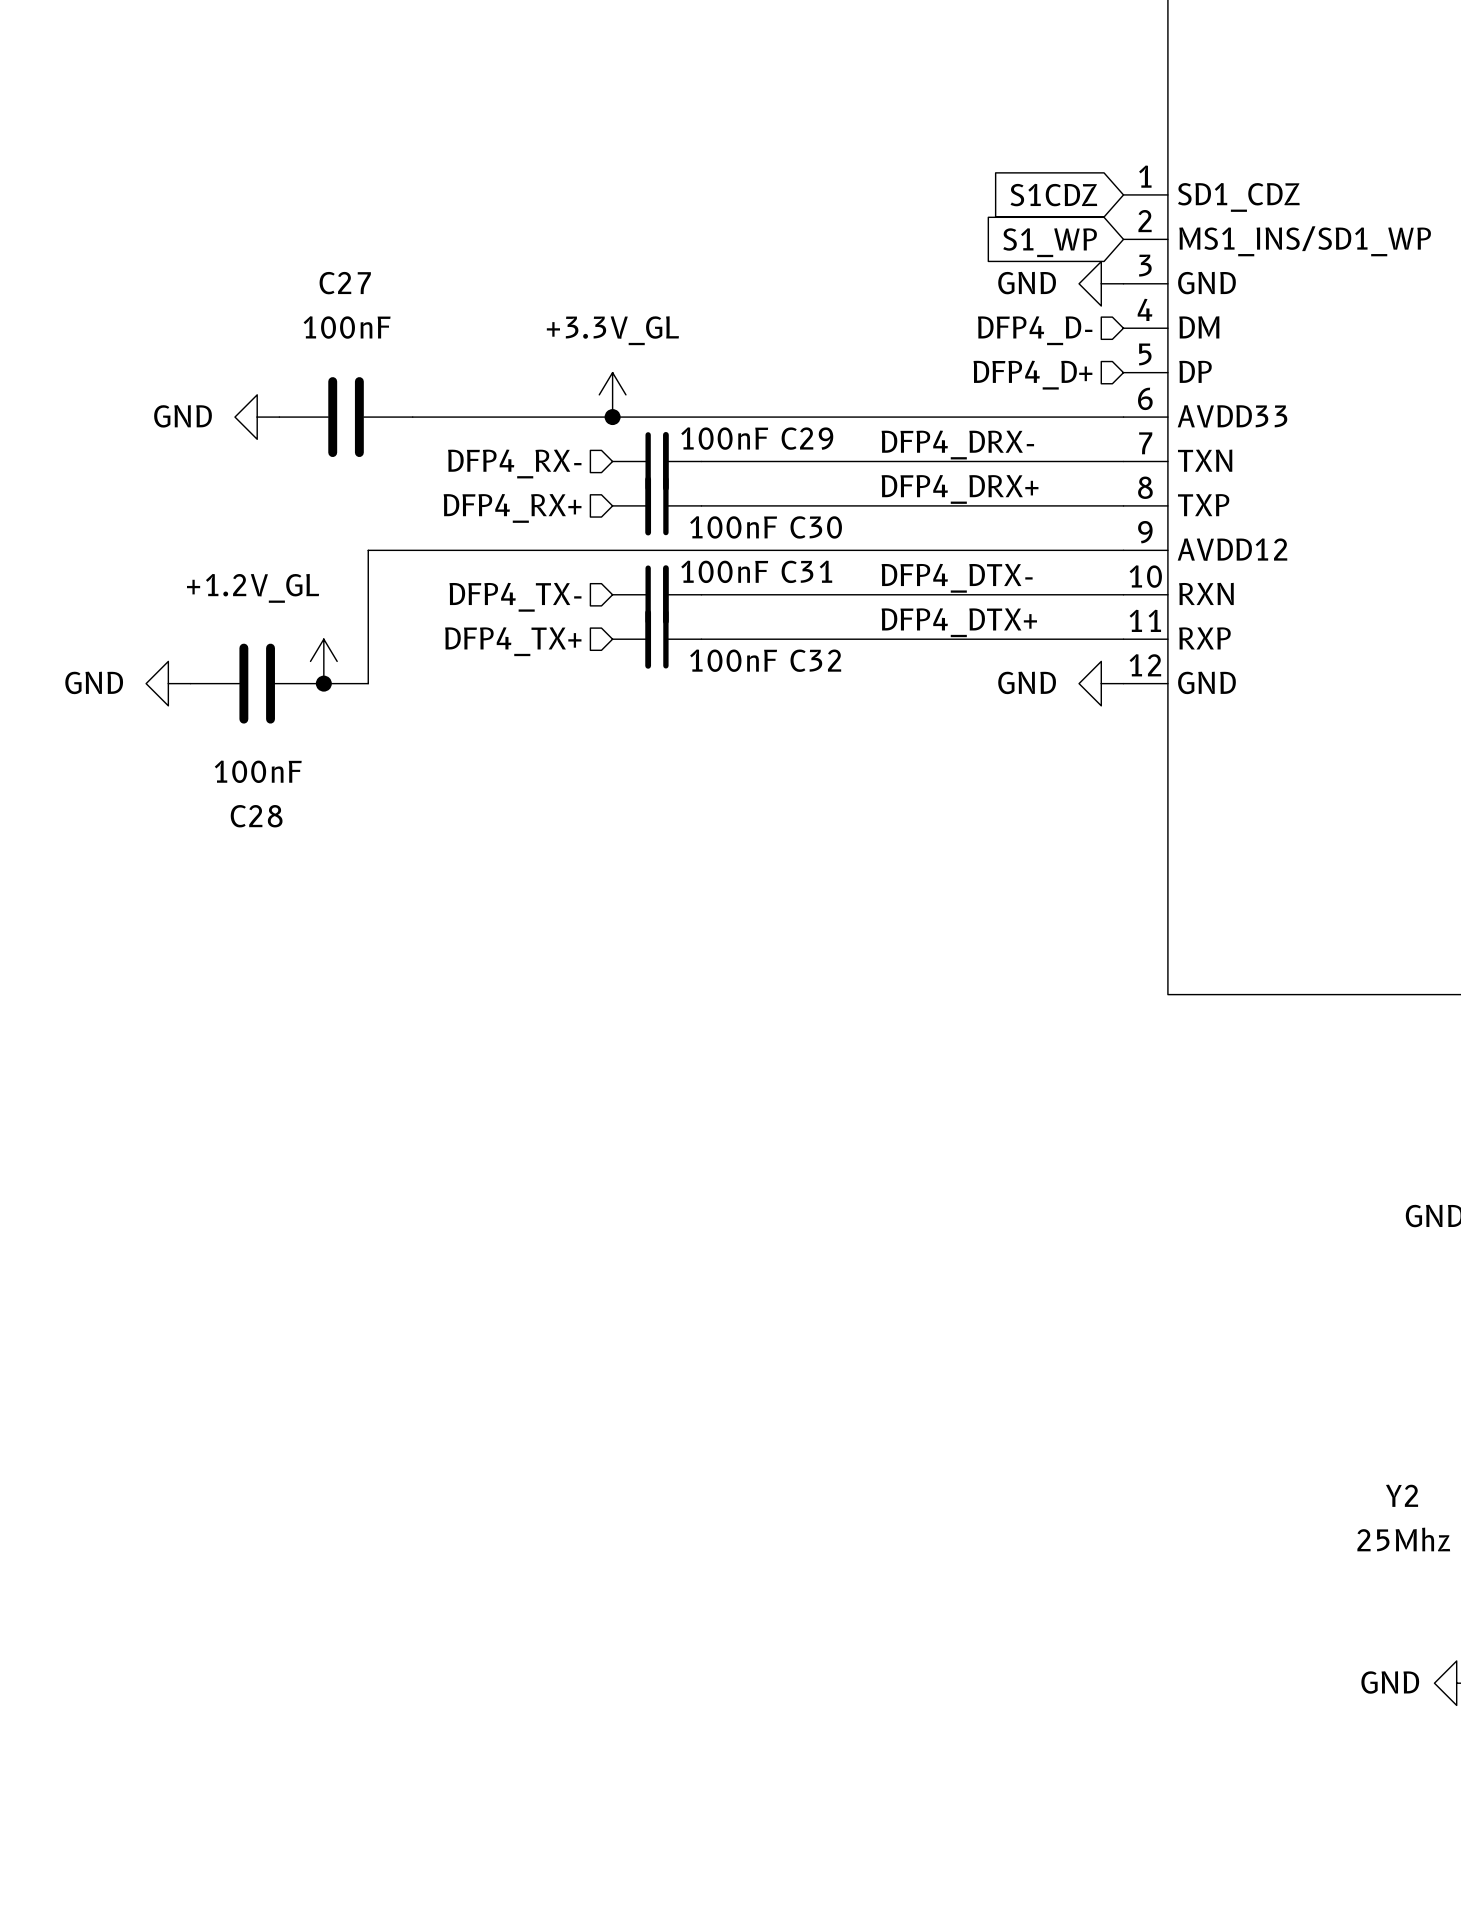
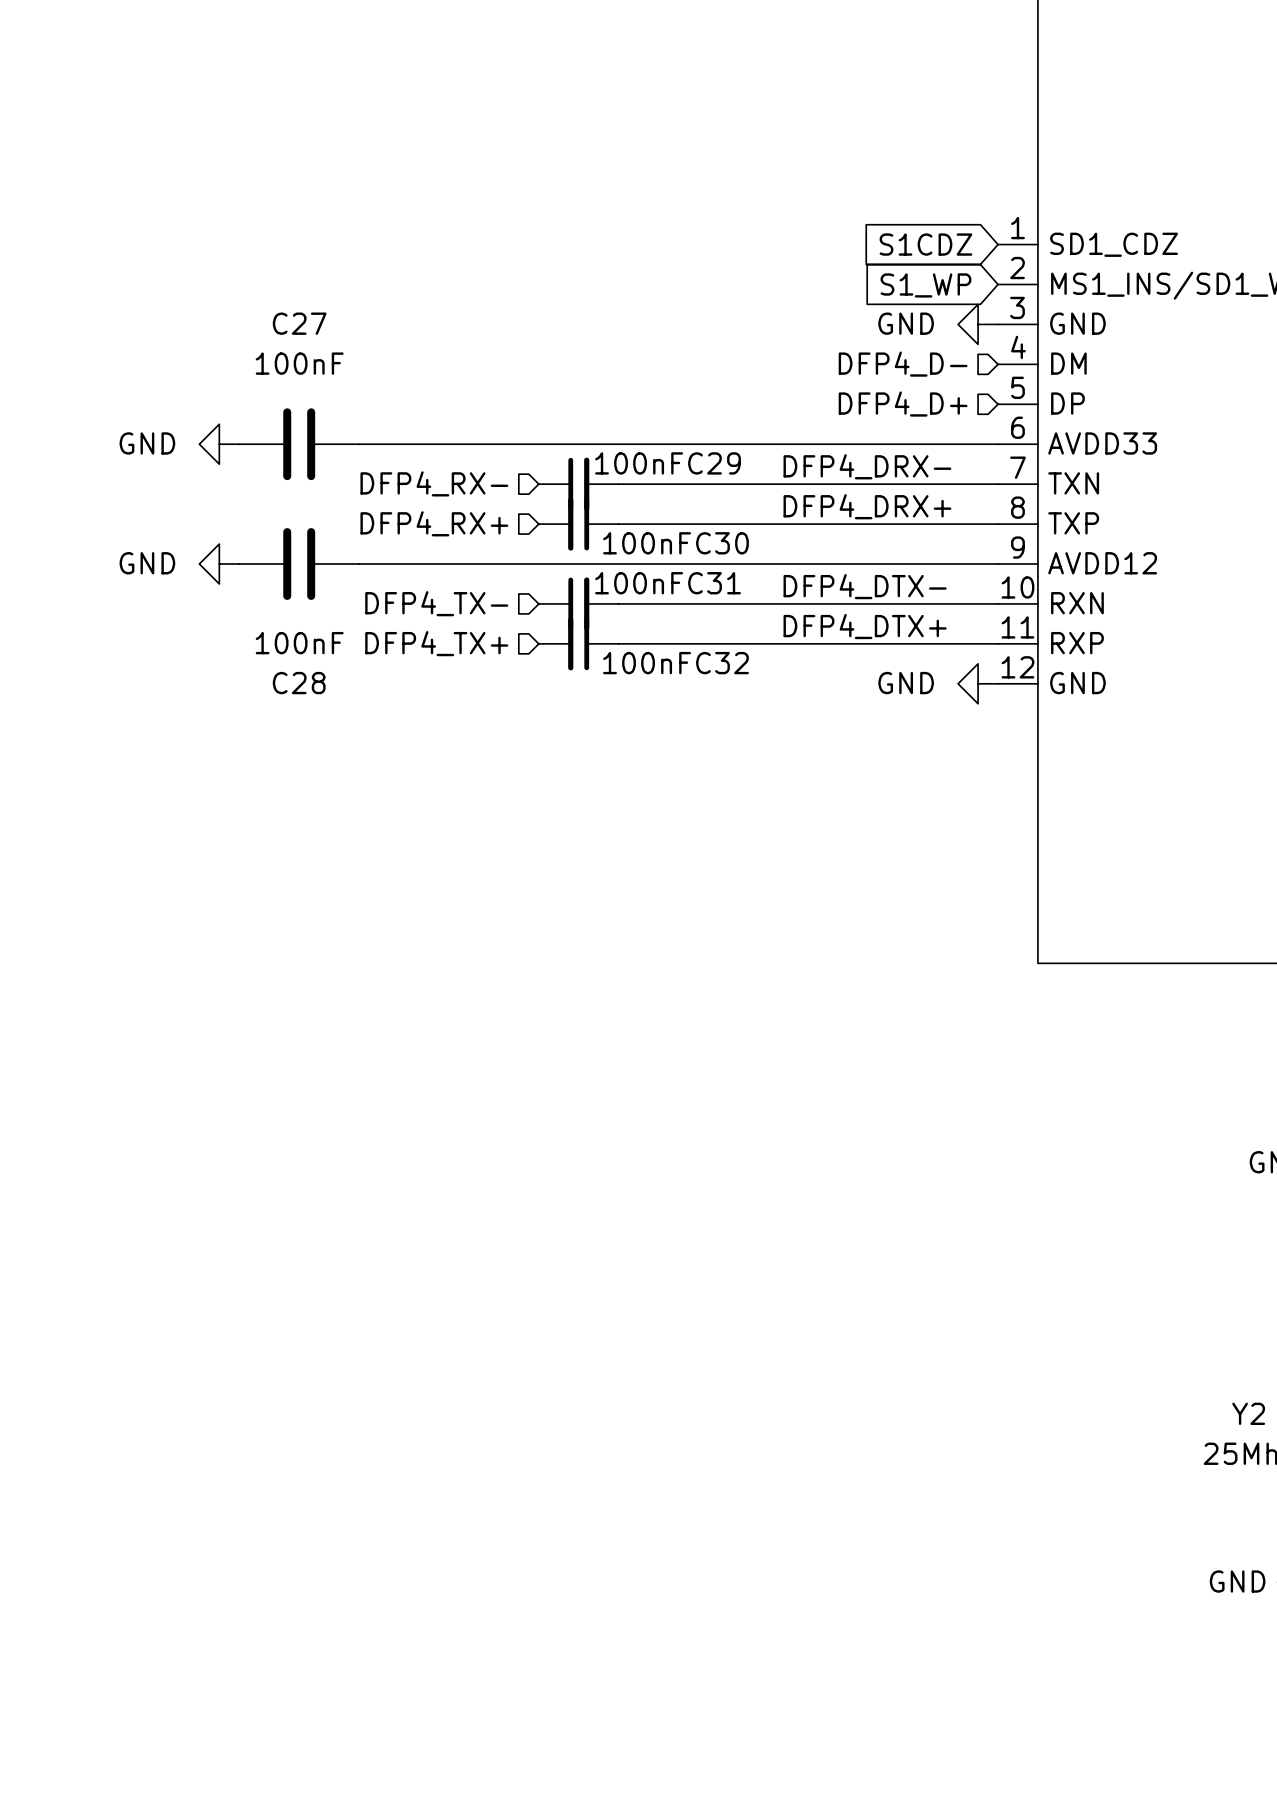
power symbol: +3.3V_GL (612, 394) -> none
junction: (612, 417) -> none
wire: (412, 550) (368, 550) (368, 683) (323, 683) -> none
power symbol: +1.2V_GL (323, 661) -> none
power symbol position: GND (168, 683) -> GND (219, 564)
C28 position: (257, 683) -> (299, 564)
junction: (323, 683) -> none

